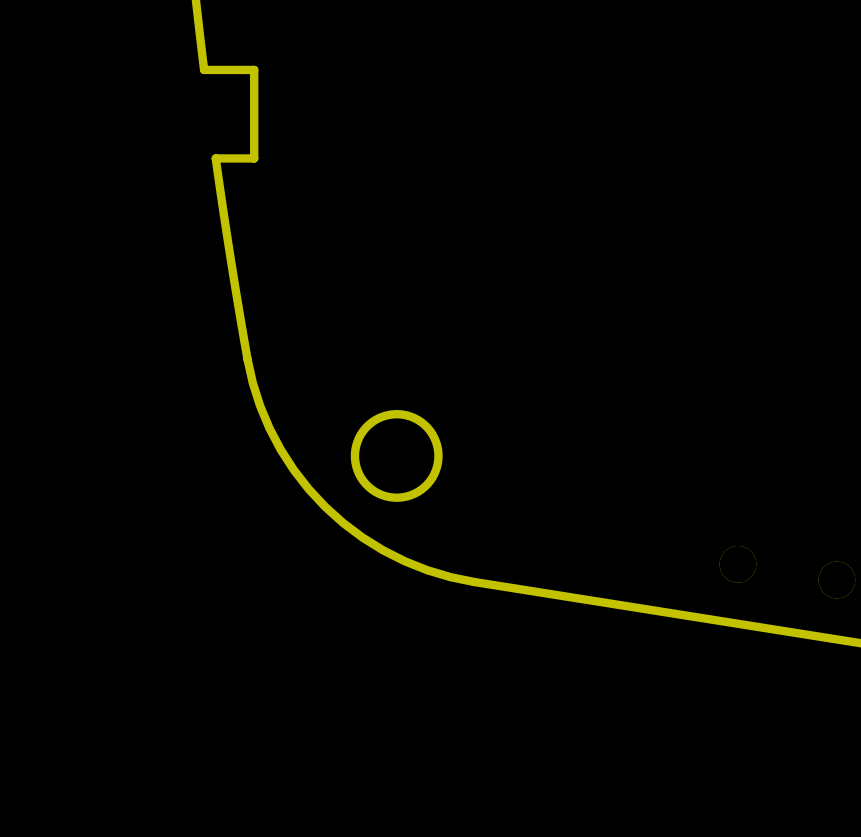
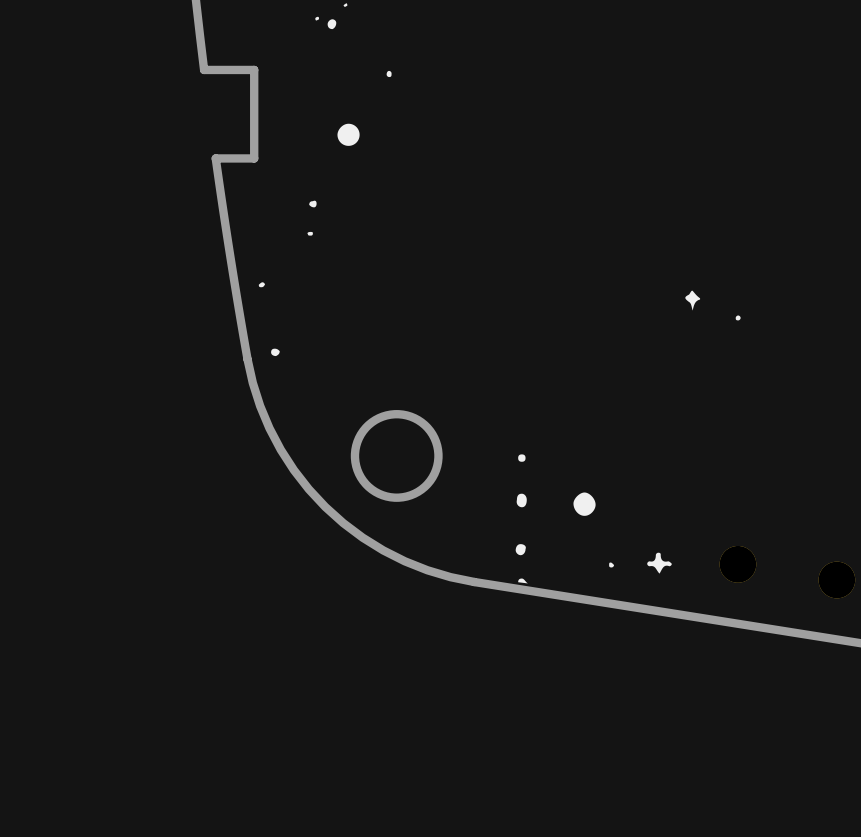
drawing: none -> [315, 3, 348, 30]
drawing: none -> [386, 70, 392, 78]
drawing: none -> [337, 123, 360, 146]
drawing: none -> [307, 200, 317, 236]
drawing: none -> [258, 282, 265, 288]
drawing: none -> [685, 290, 741, 321]
drawing: none -> [271, 348, 280, 357]
drawing: none -> [515, 454, 528, 584]
drawing: none -> [573, 492, 596, 516]
drawing: none -> [609, 552, 672, 574]

